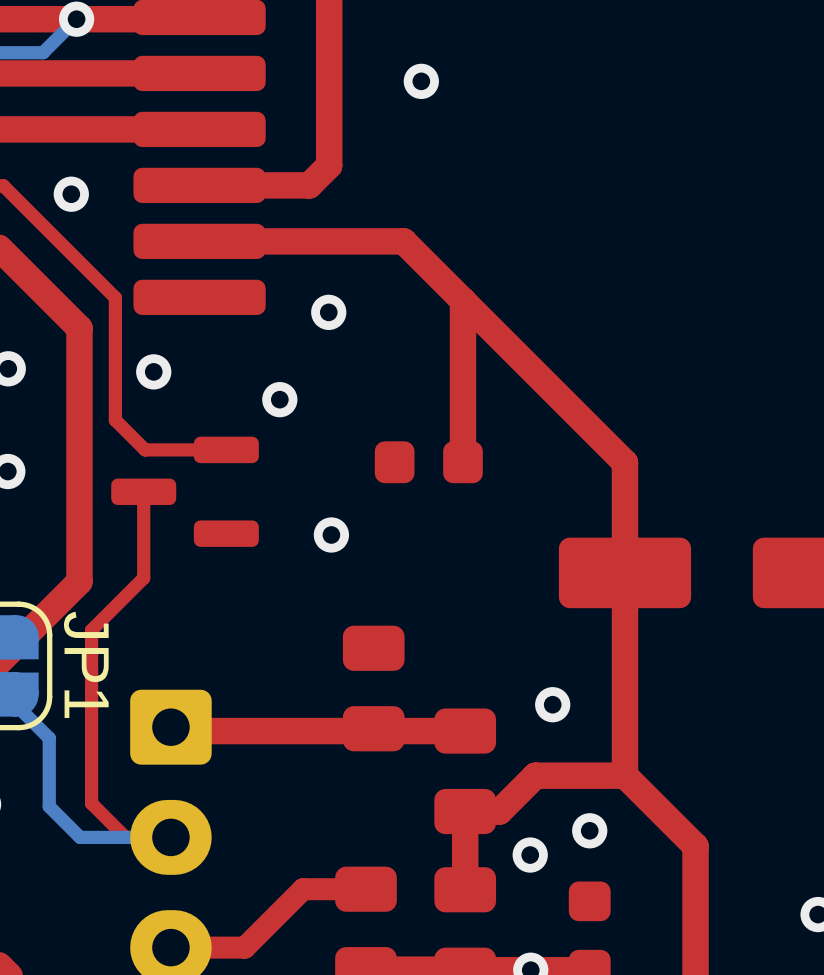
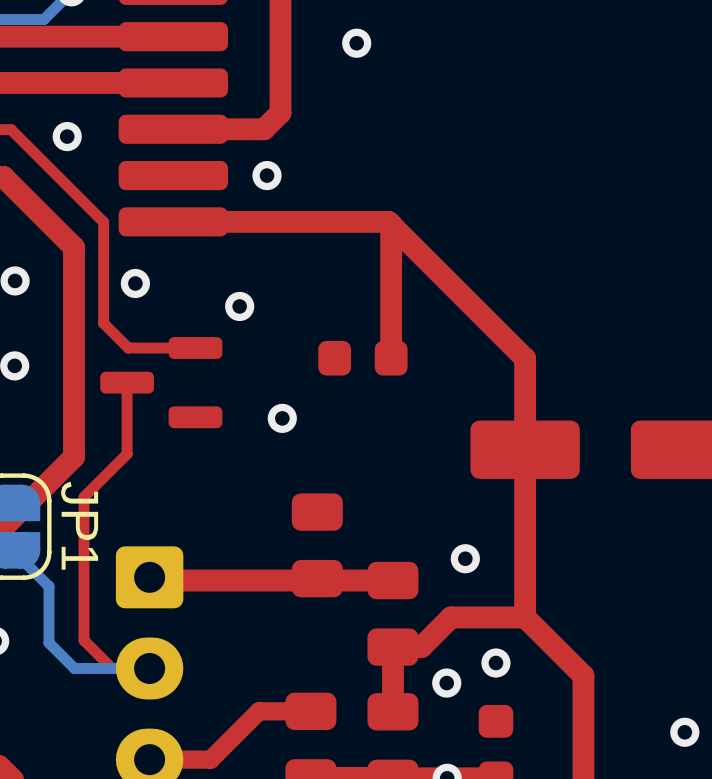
top track: (199, 241) (403, 241) (459, 297) -> (173, 221) (388, 221)
via position: (328, 312) -> (267, 175)

